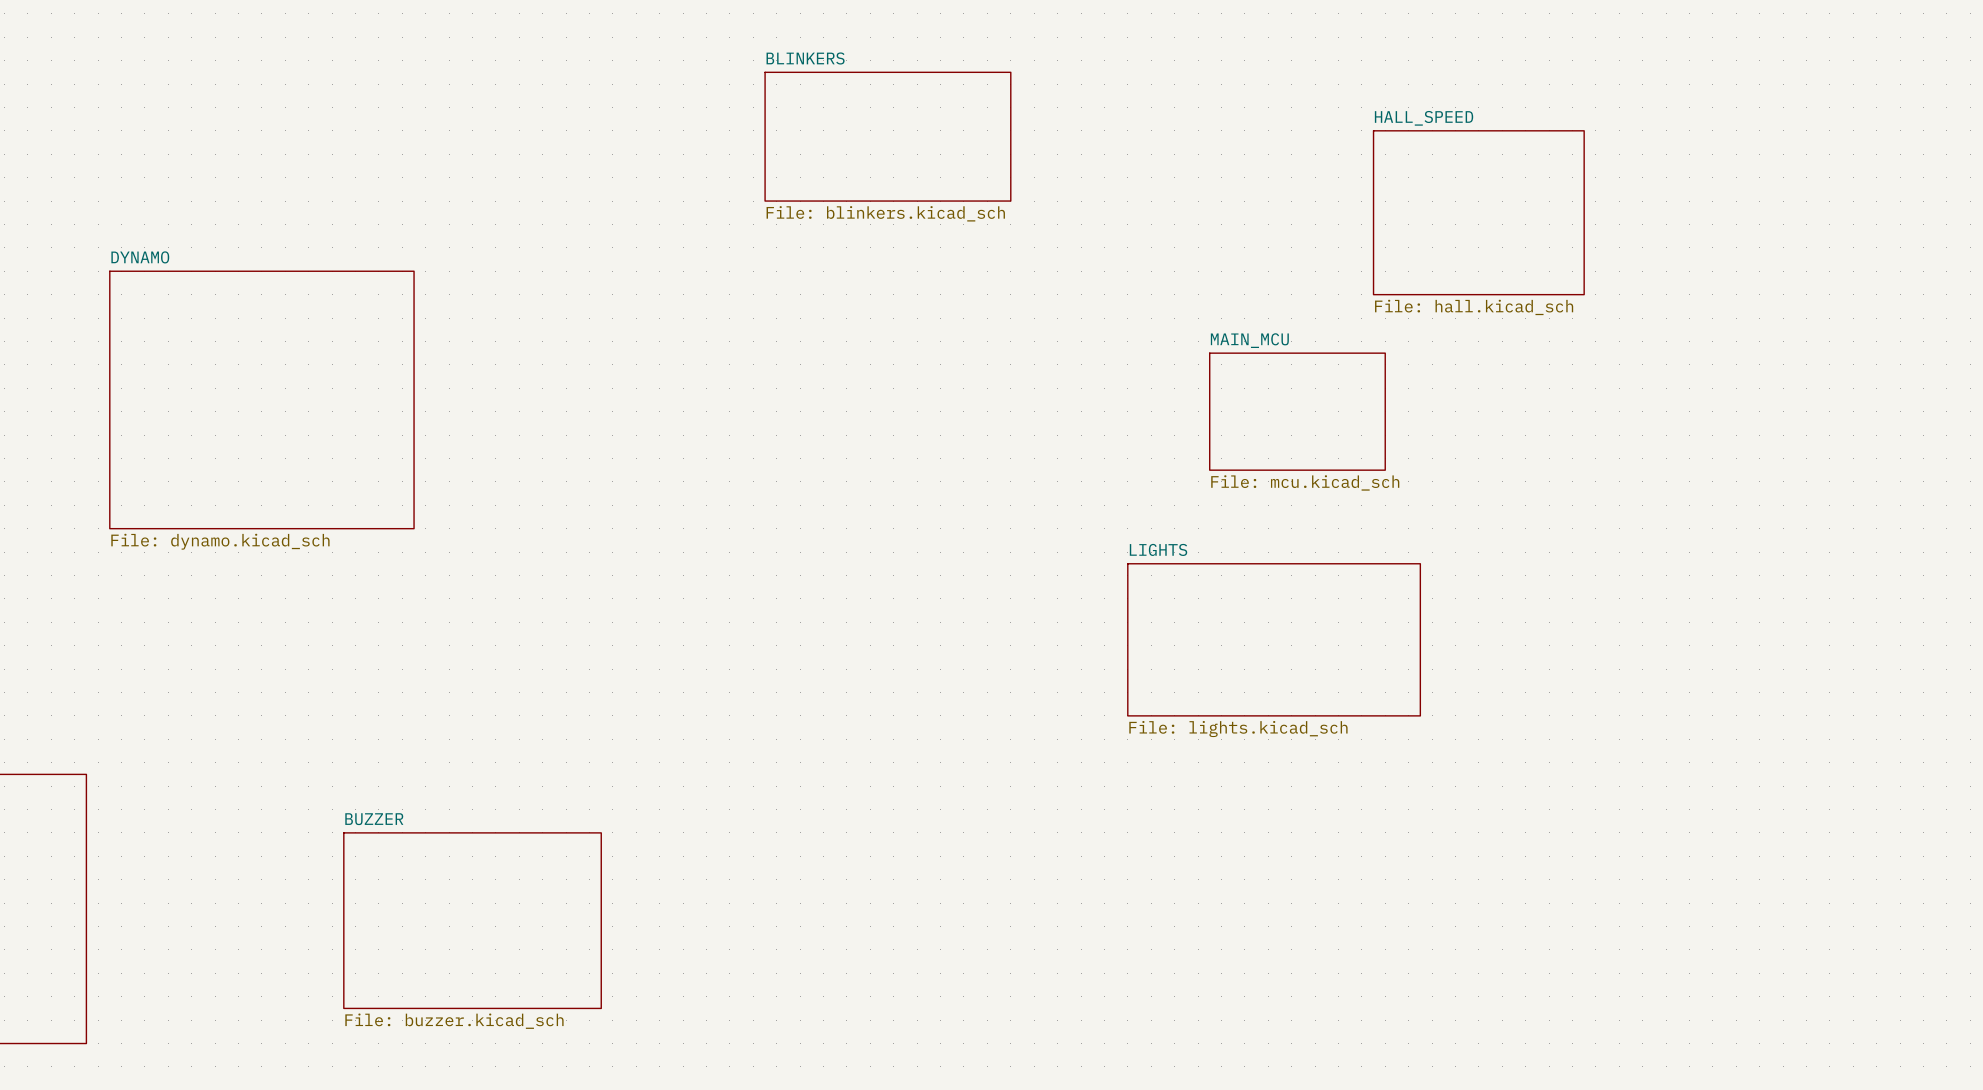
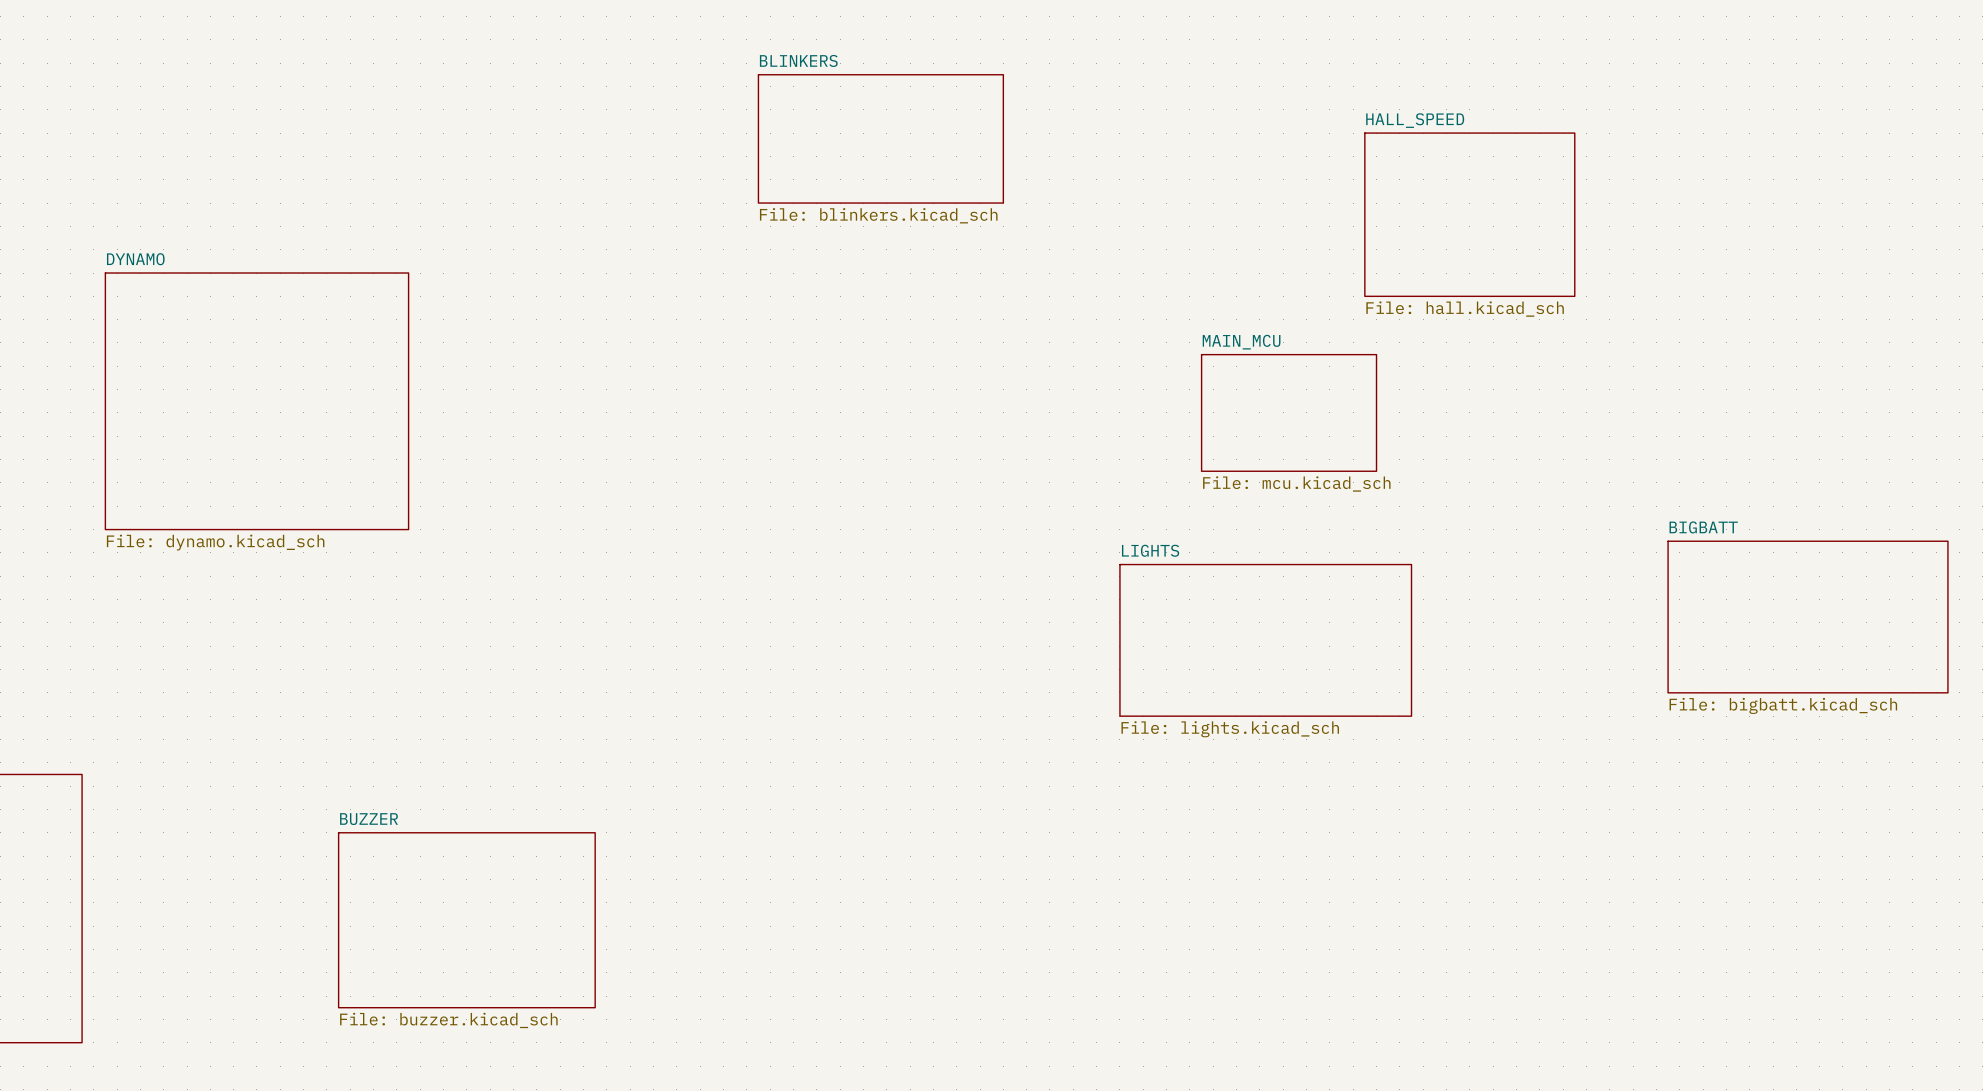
sheet BIGBATT: none -> File: bigbatt.kicad_sch (1808, 617)

